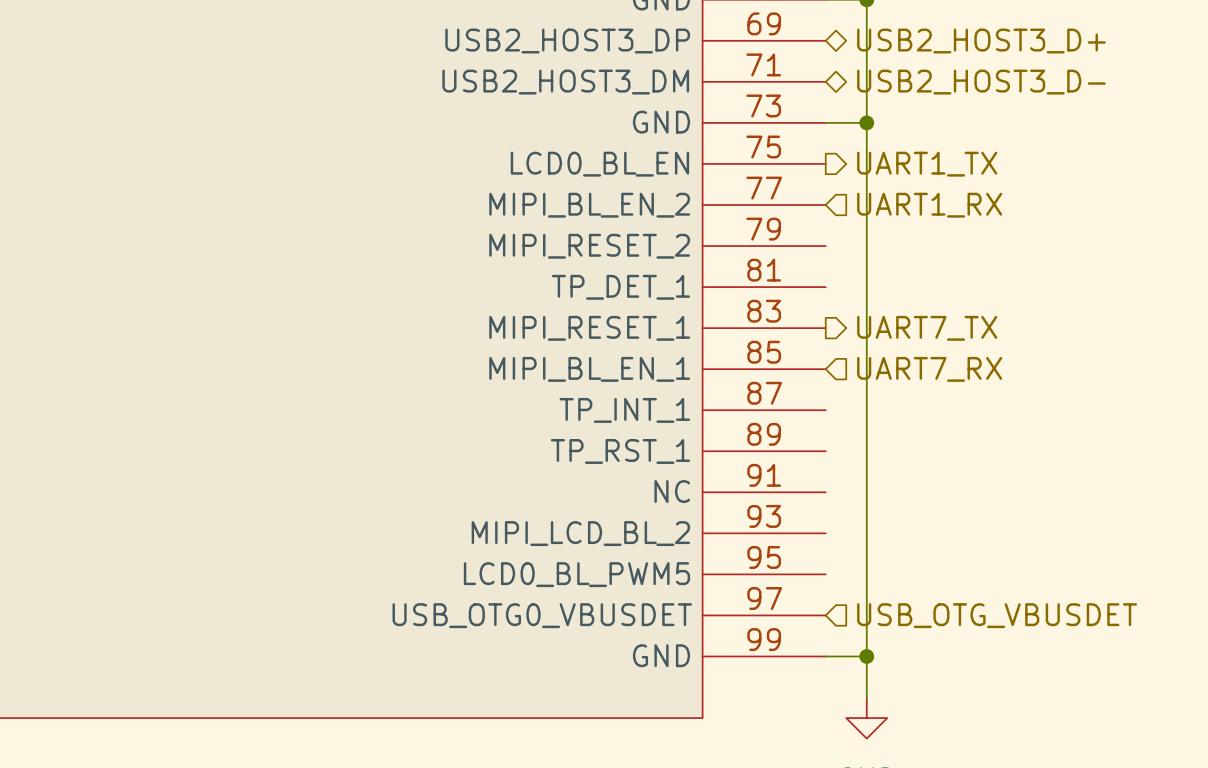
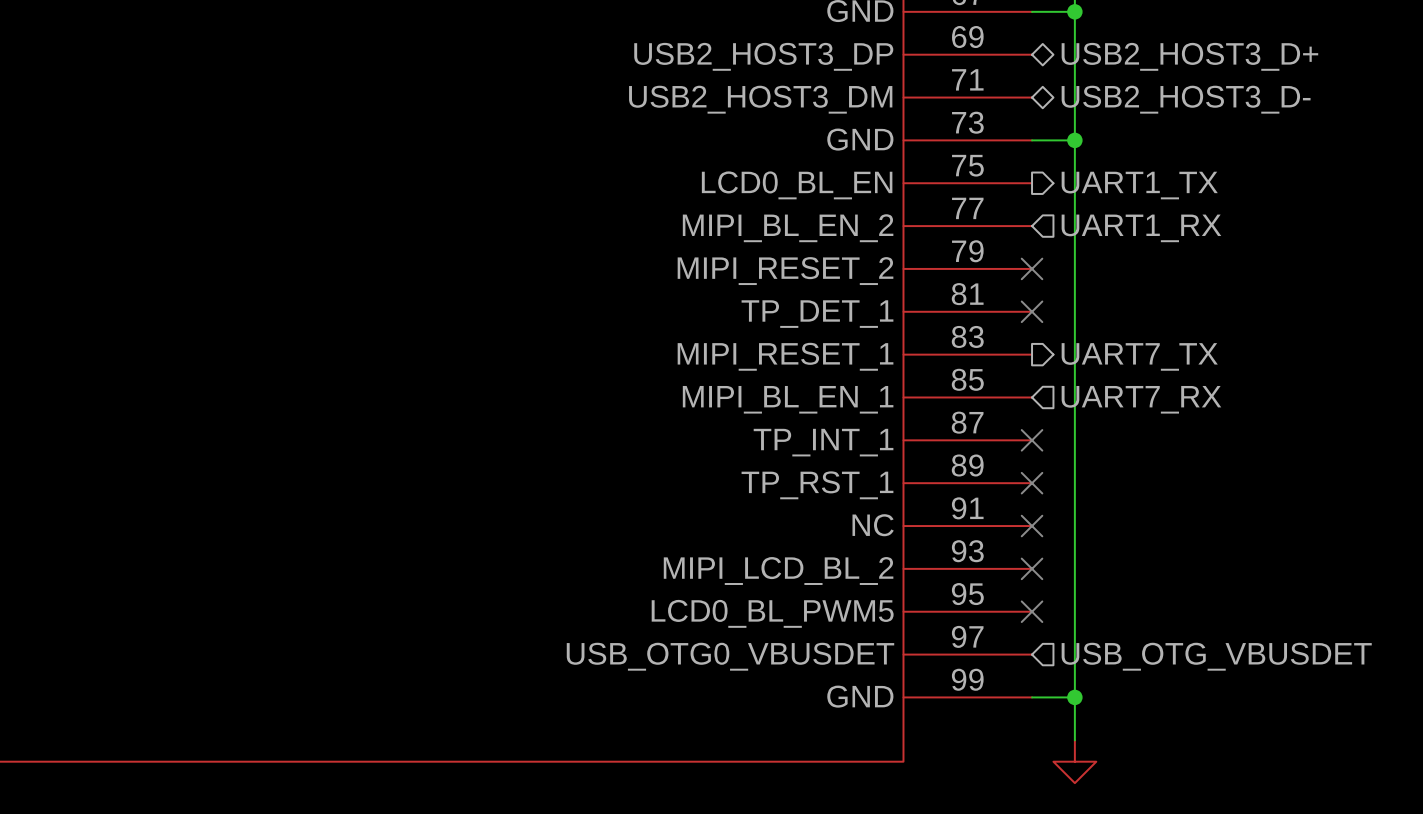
no-connect mark: none -> (1032, 268)
no-connect mark: none -> (1032, 311)
no-connect mark: none -> (1032, 440)
no-connect mark: none -> (1032, 483)
no-connect mark: none -> (1032, 526)
no-connect mark: none -> (1032, 568)
no-connect mark: none -> (1032, 611)

